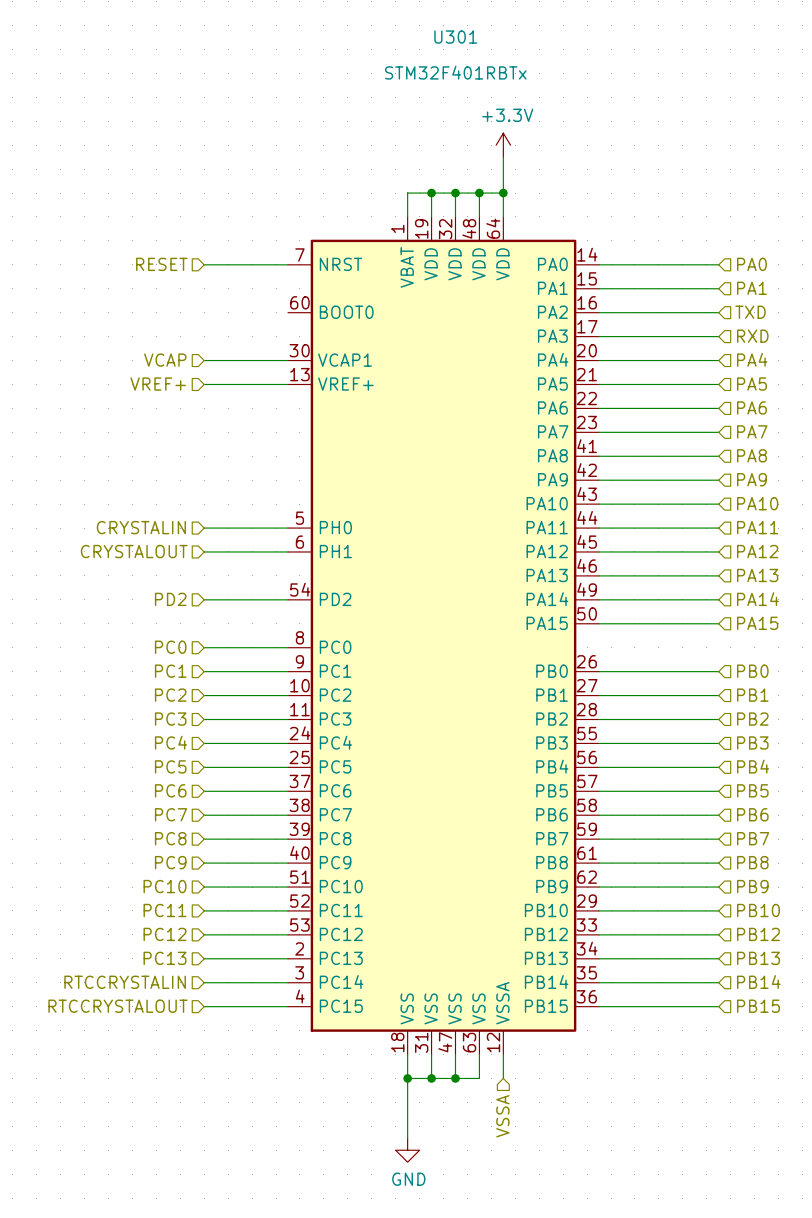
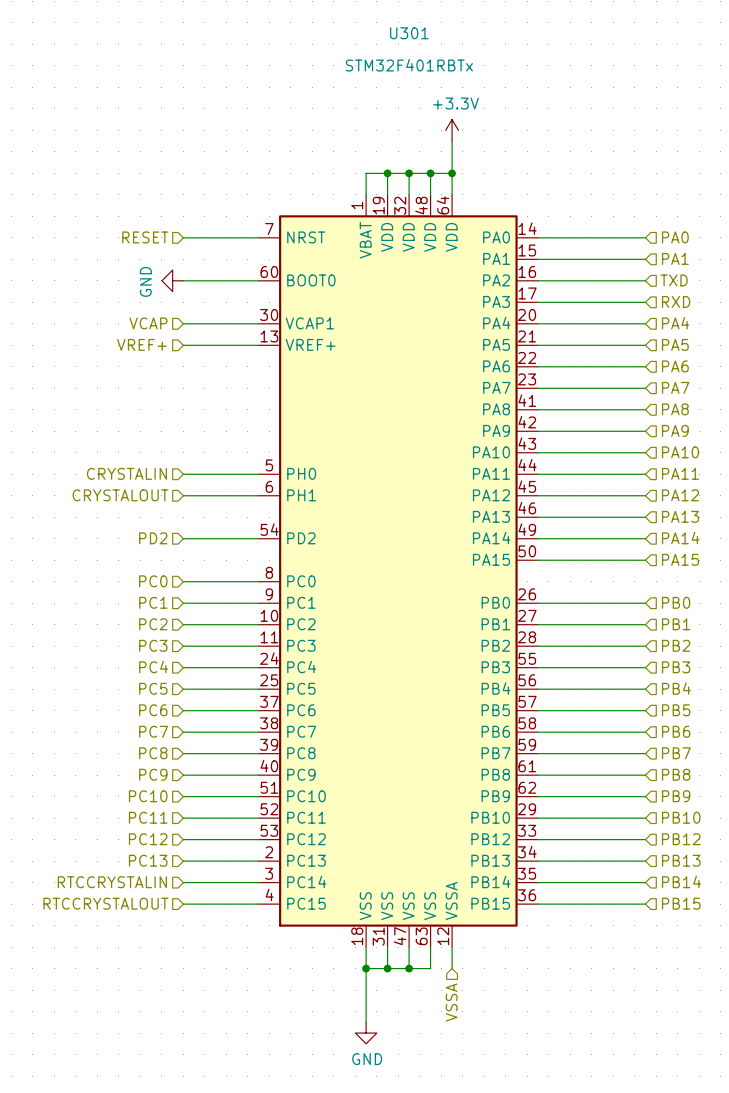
power symbol: none -> GND (172, 280)
wire: none -> (183, 280) (258, 280)

